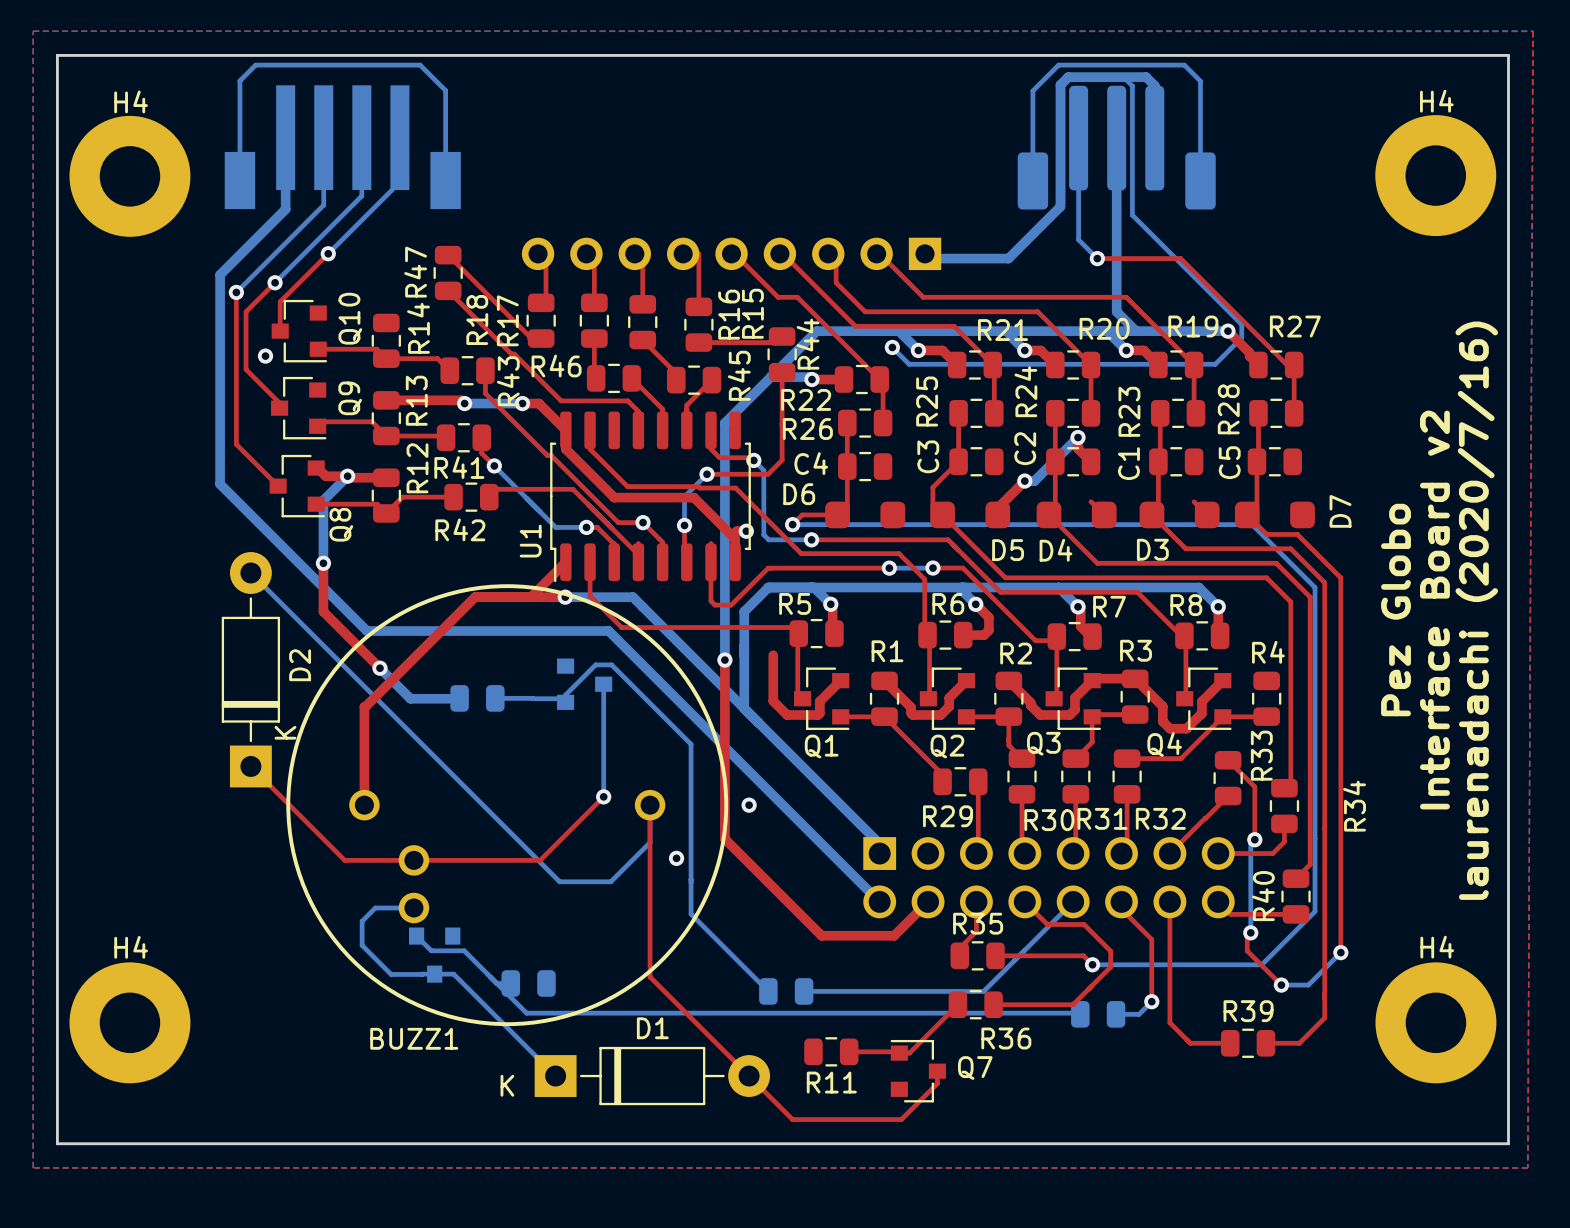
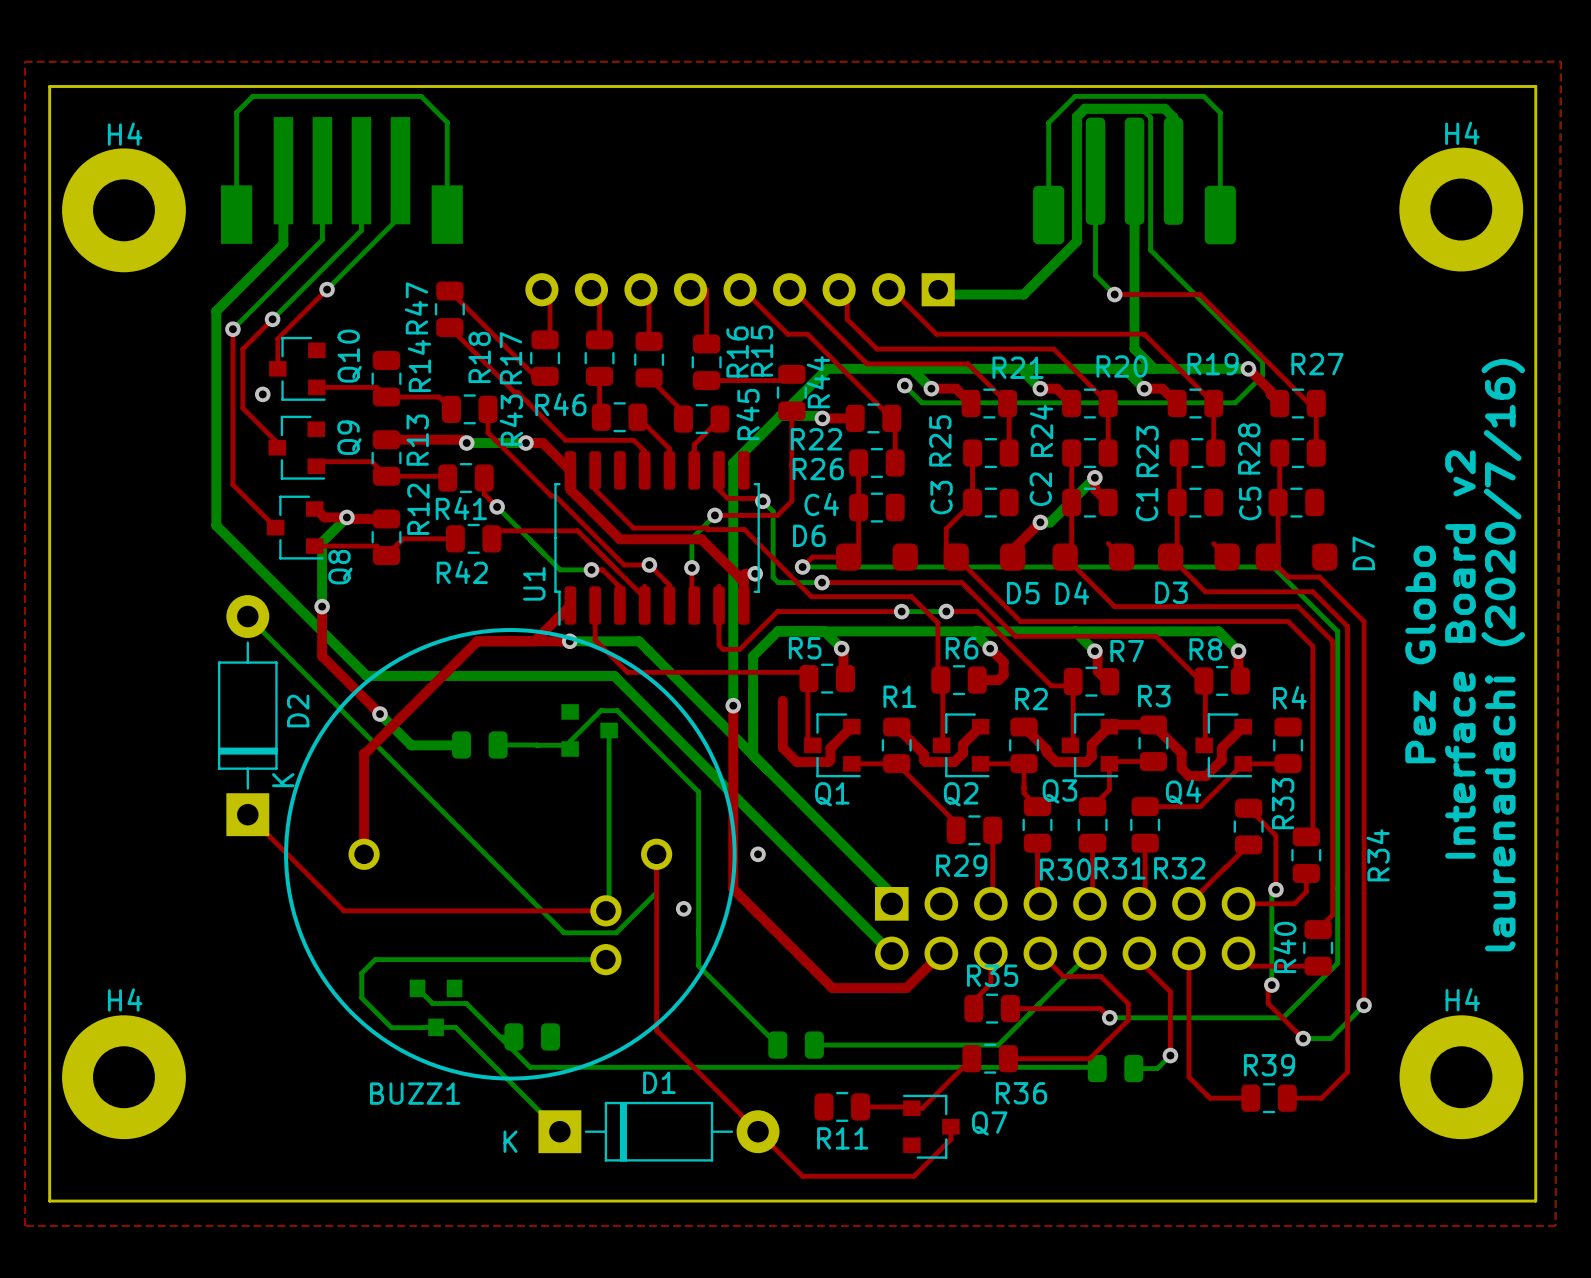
BUZZ1 footprint: [286, 584, 729, 1027] -> [284, 628, 737, 1081]
top track: (603, 796) (540, 860) -> (605, 910) (544, 910)
bottom track: none -> (609, 845) (609, 907) (605, 910)
via: (603, 796) -> none
bottom track: none -> (414, 959) (605, 959)

